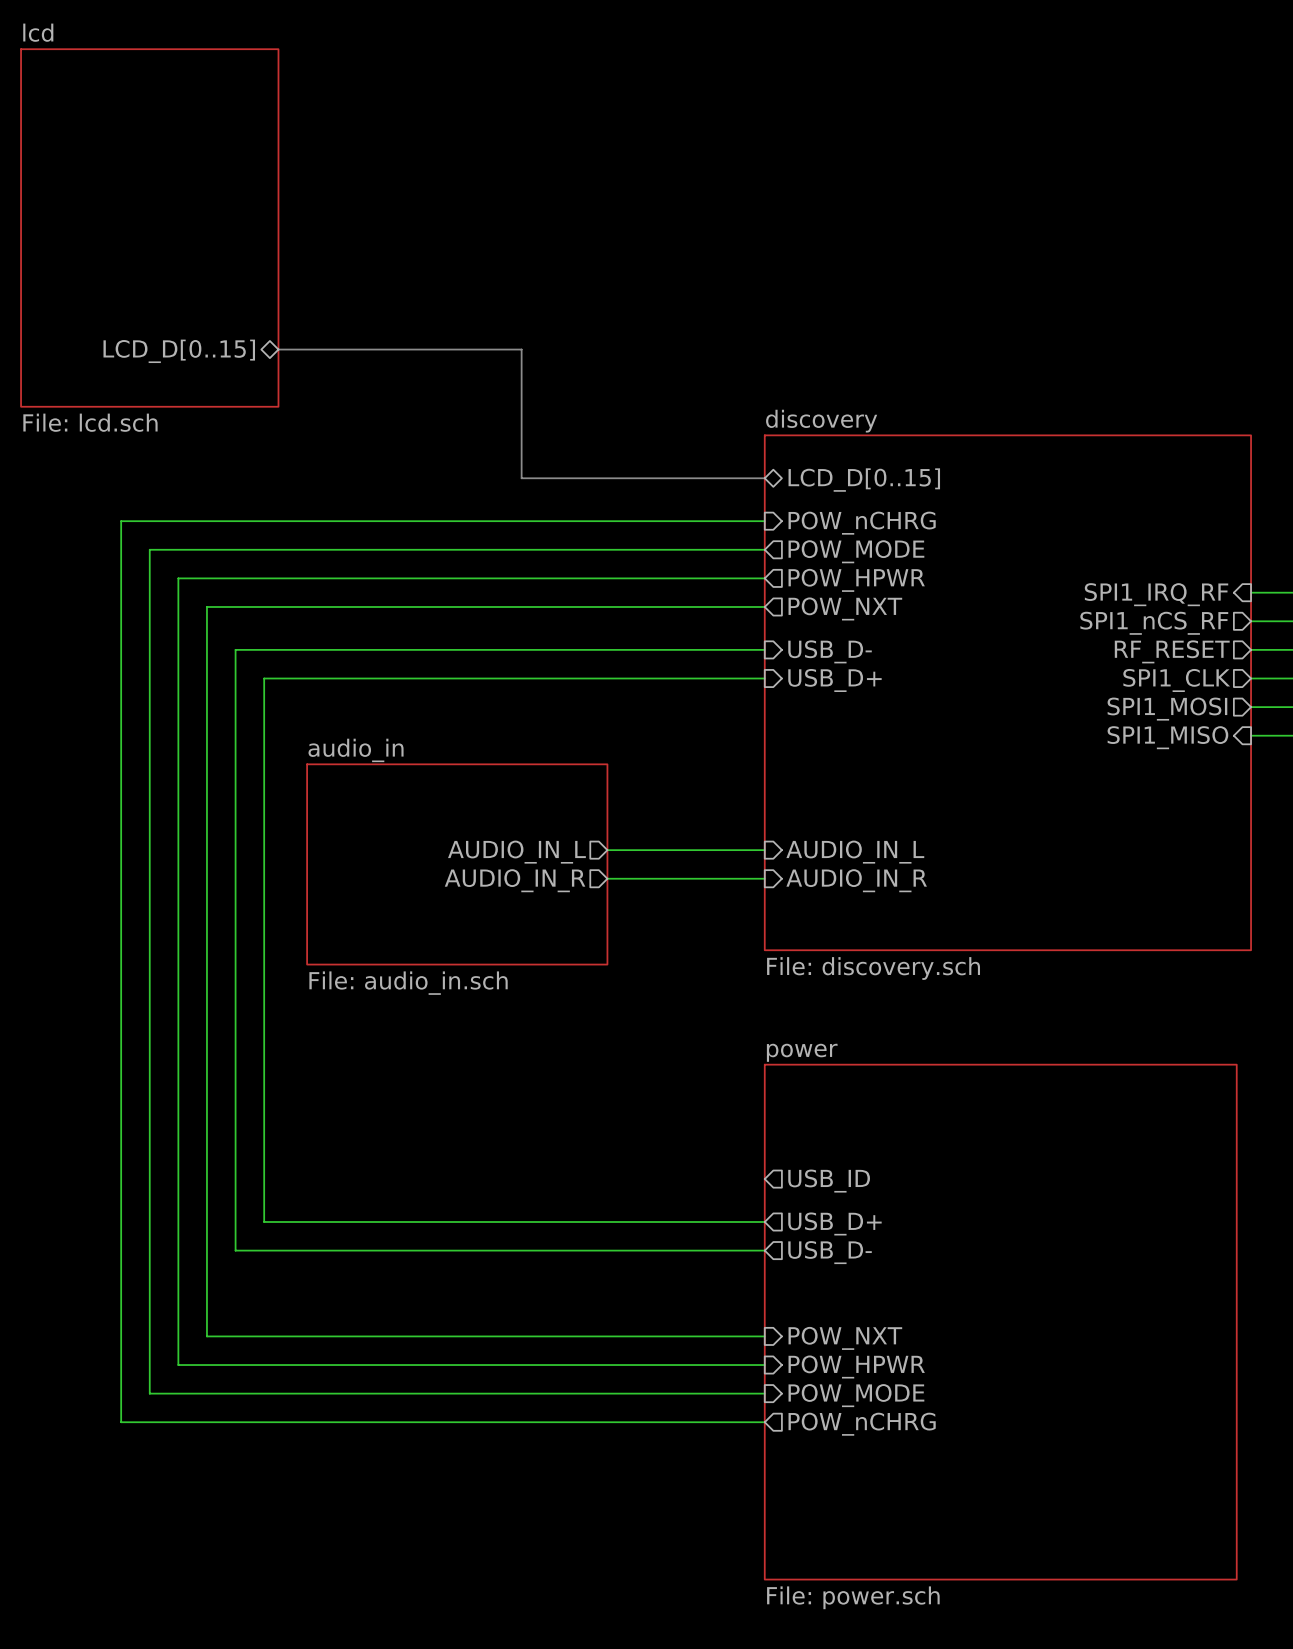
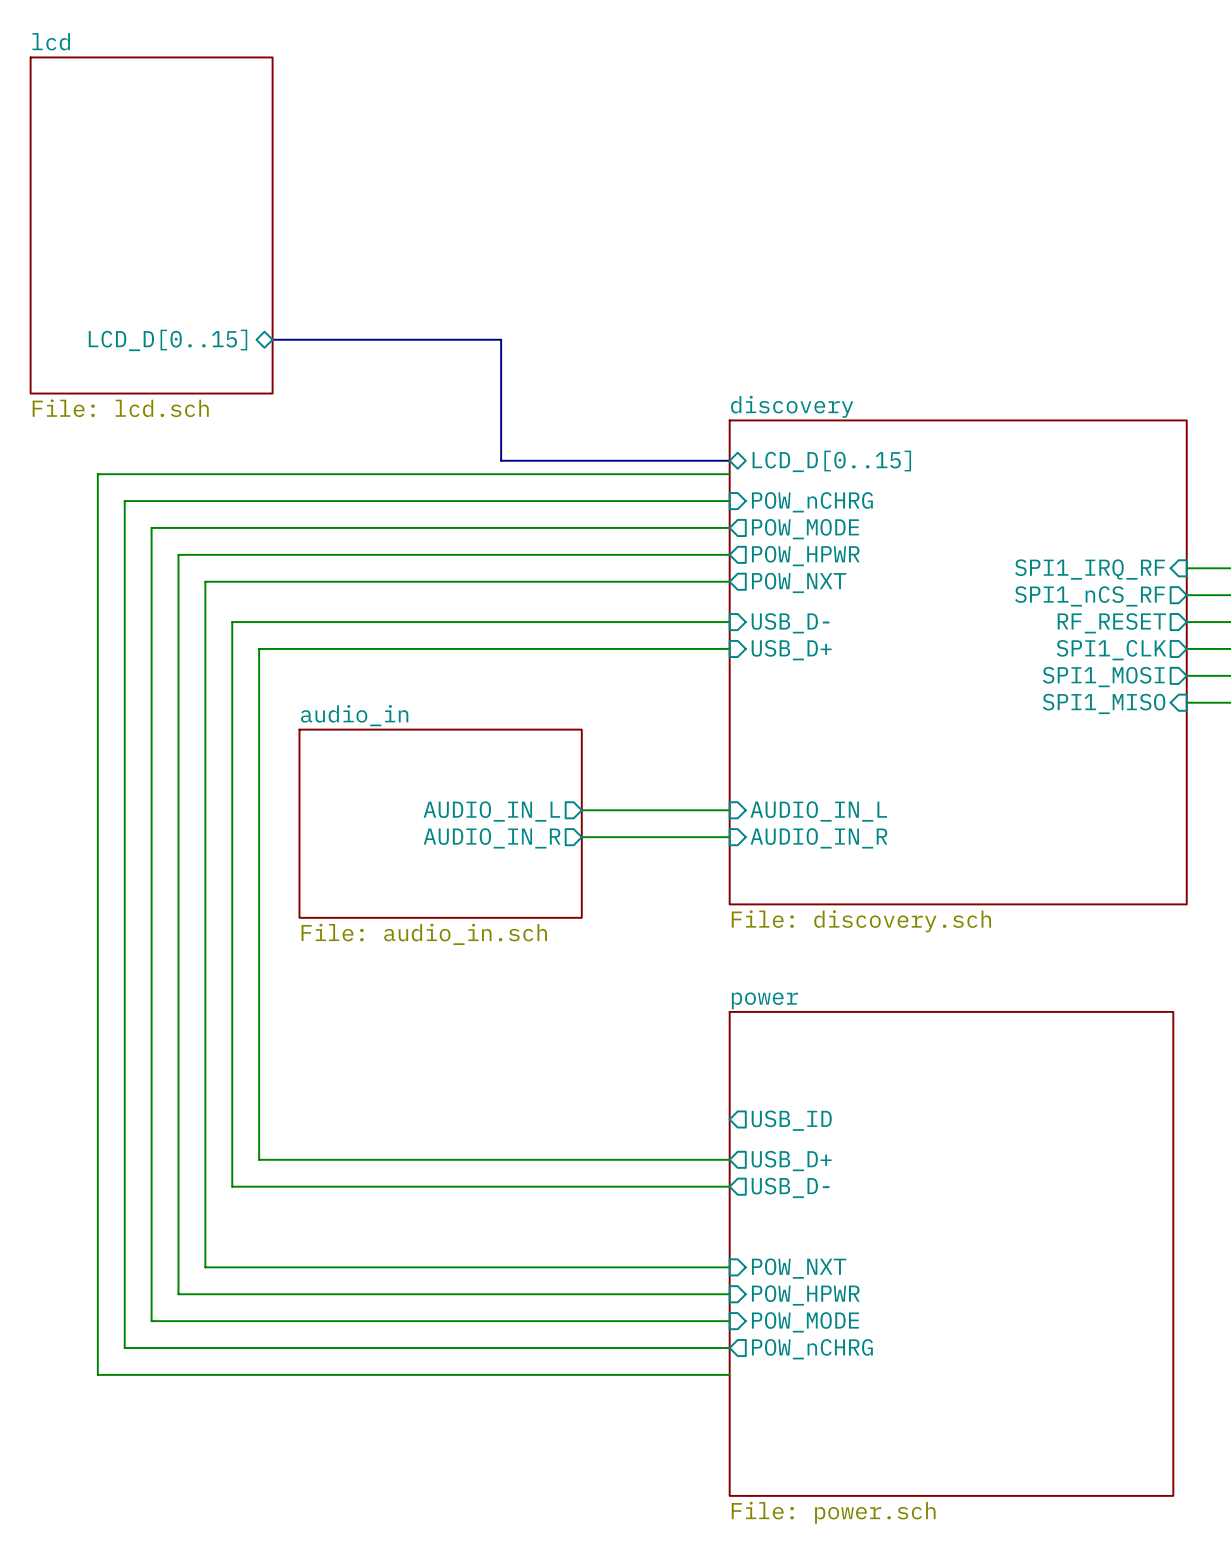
wire: none -> (729, 474) (97, 474) (97, 1374) (729, 1374)

